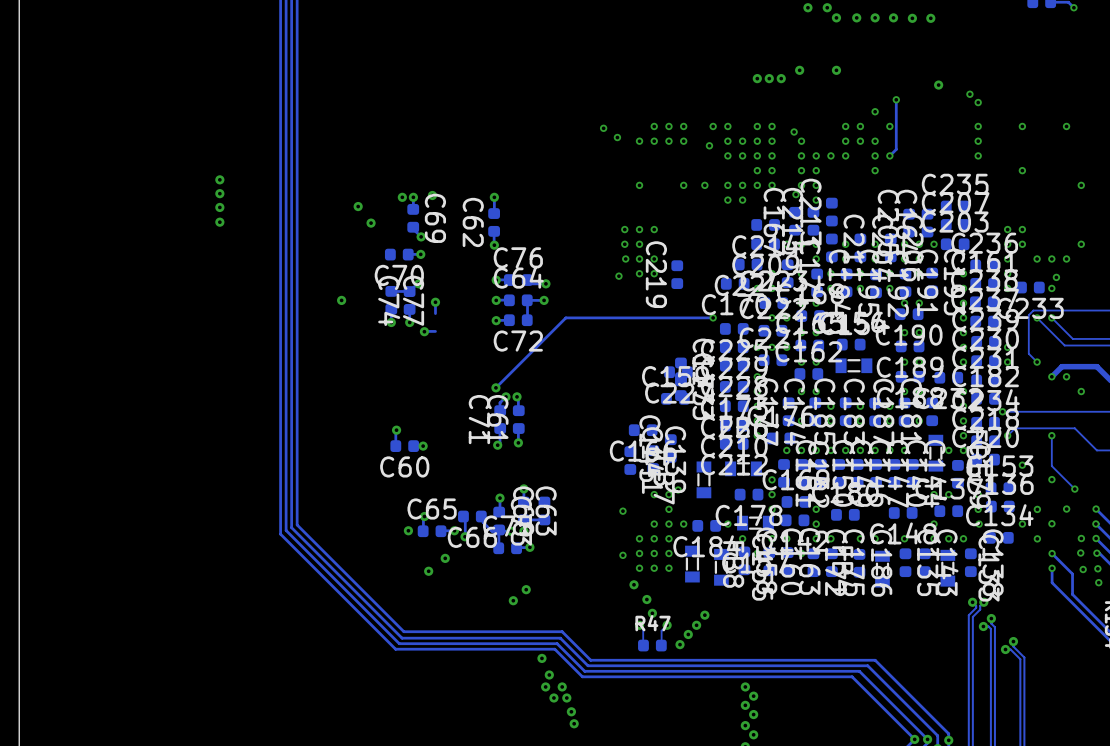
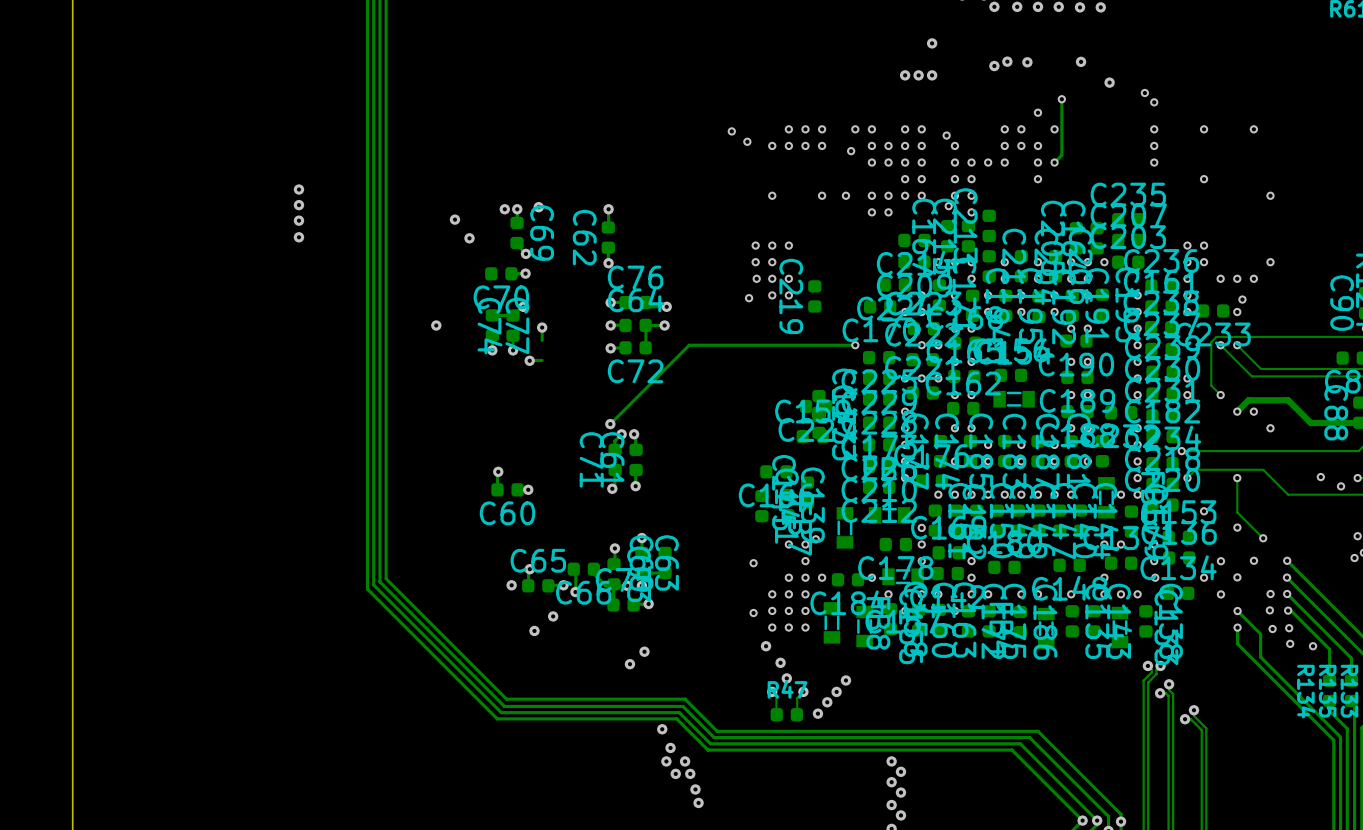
via: none -> (932, 43)
via: none -> (1007, 61)
via: none -> (1081, 61)
via: none -> (1027, 62)
via: (799, 70) -> none

